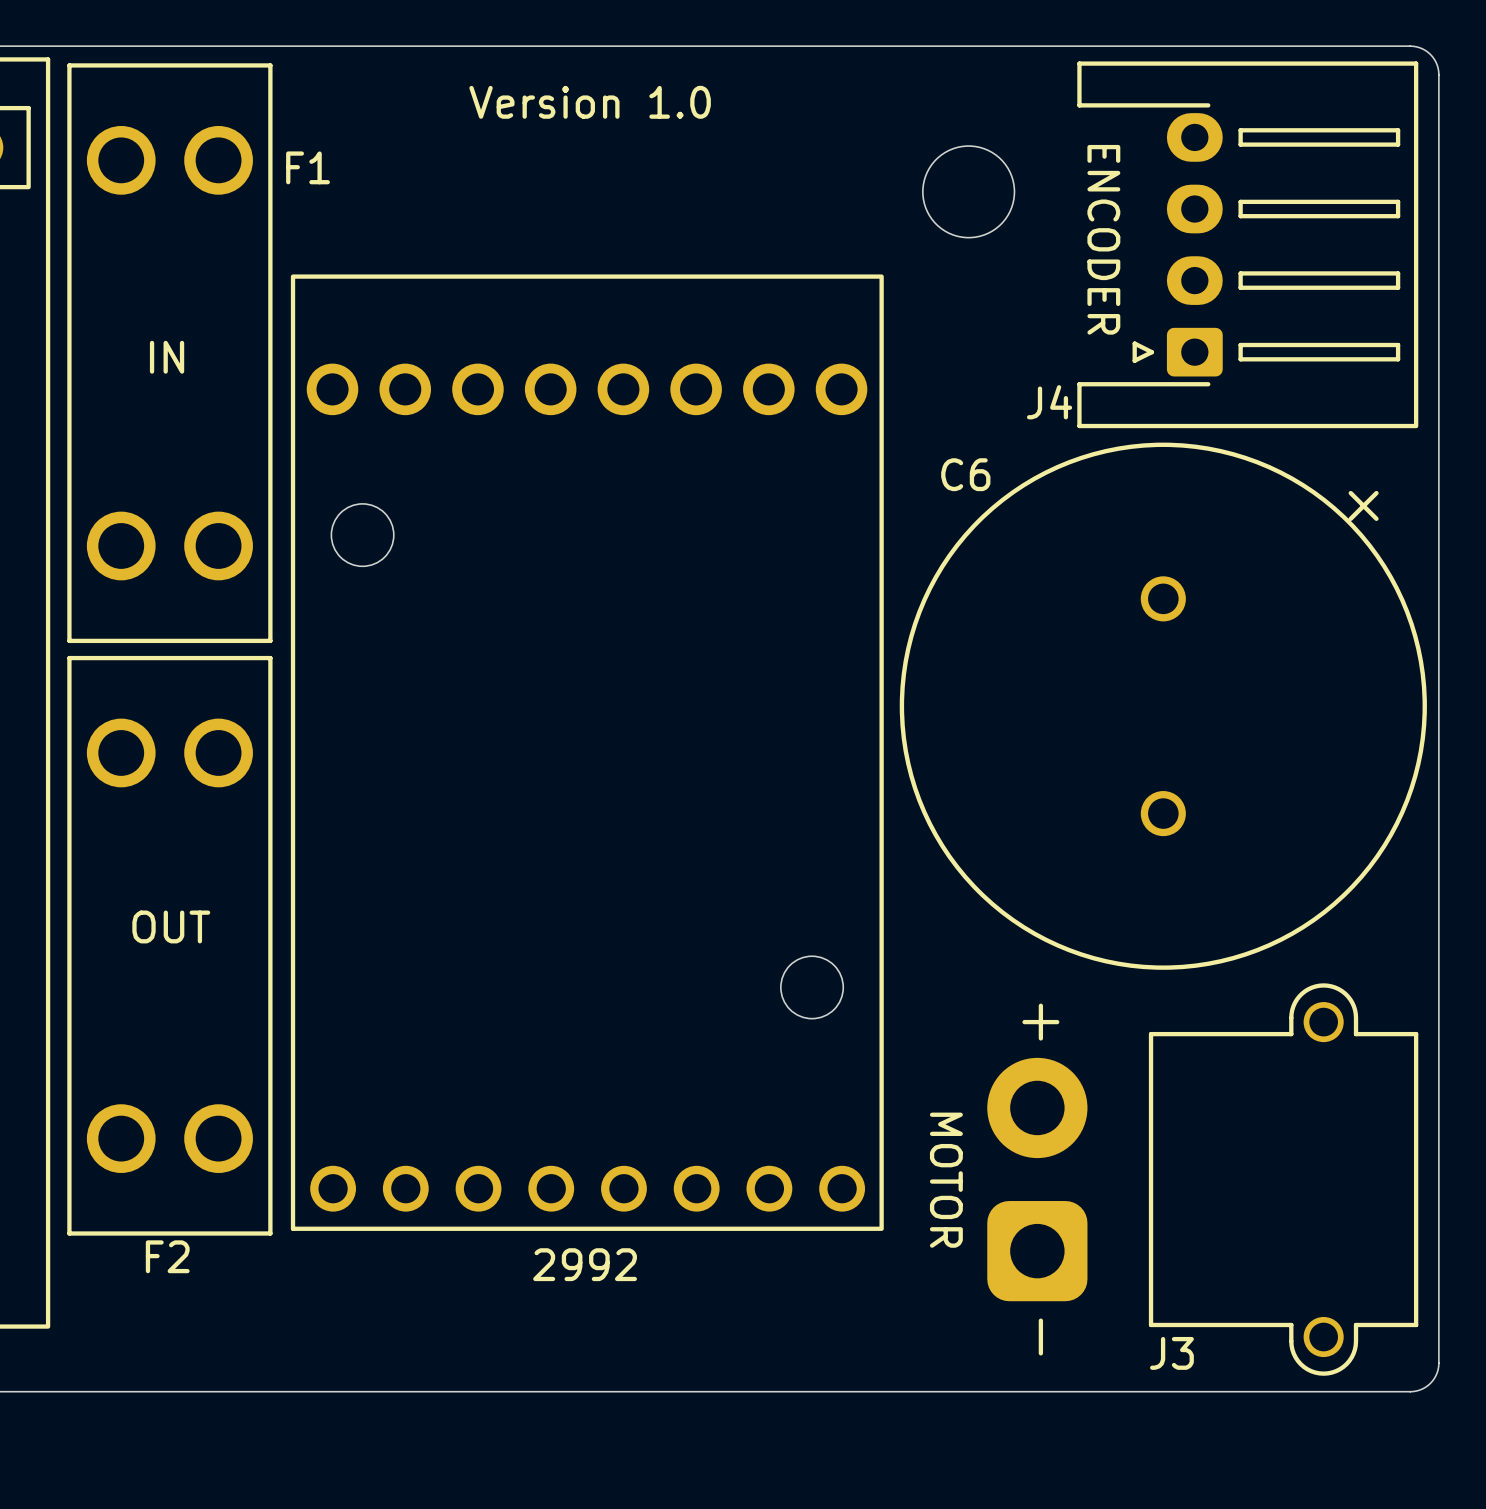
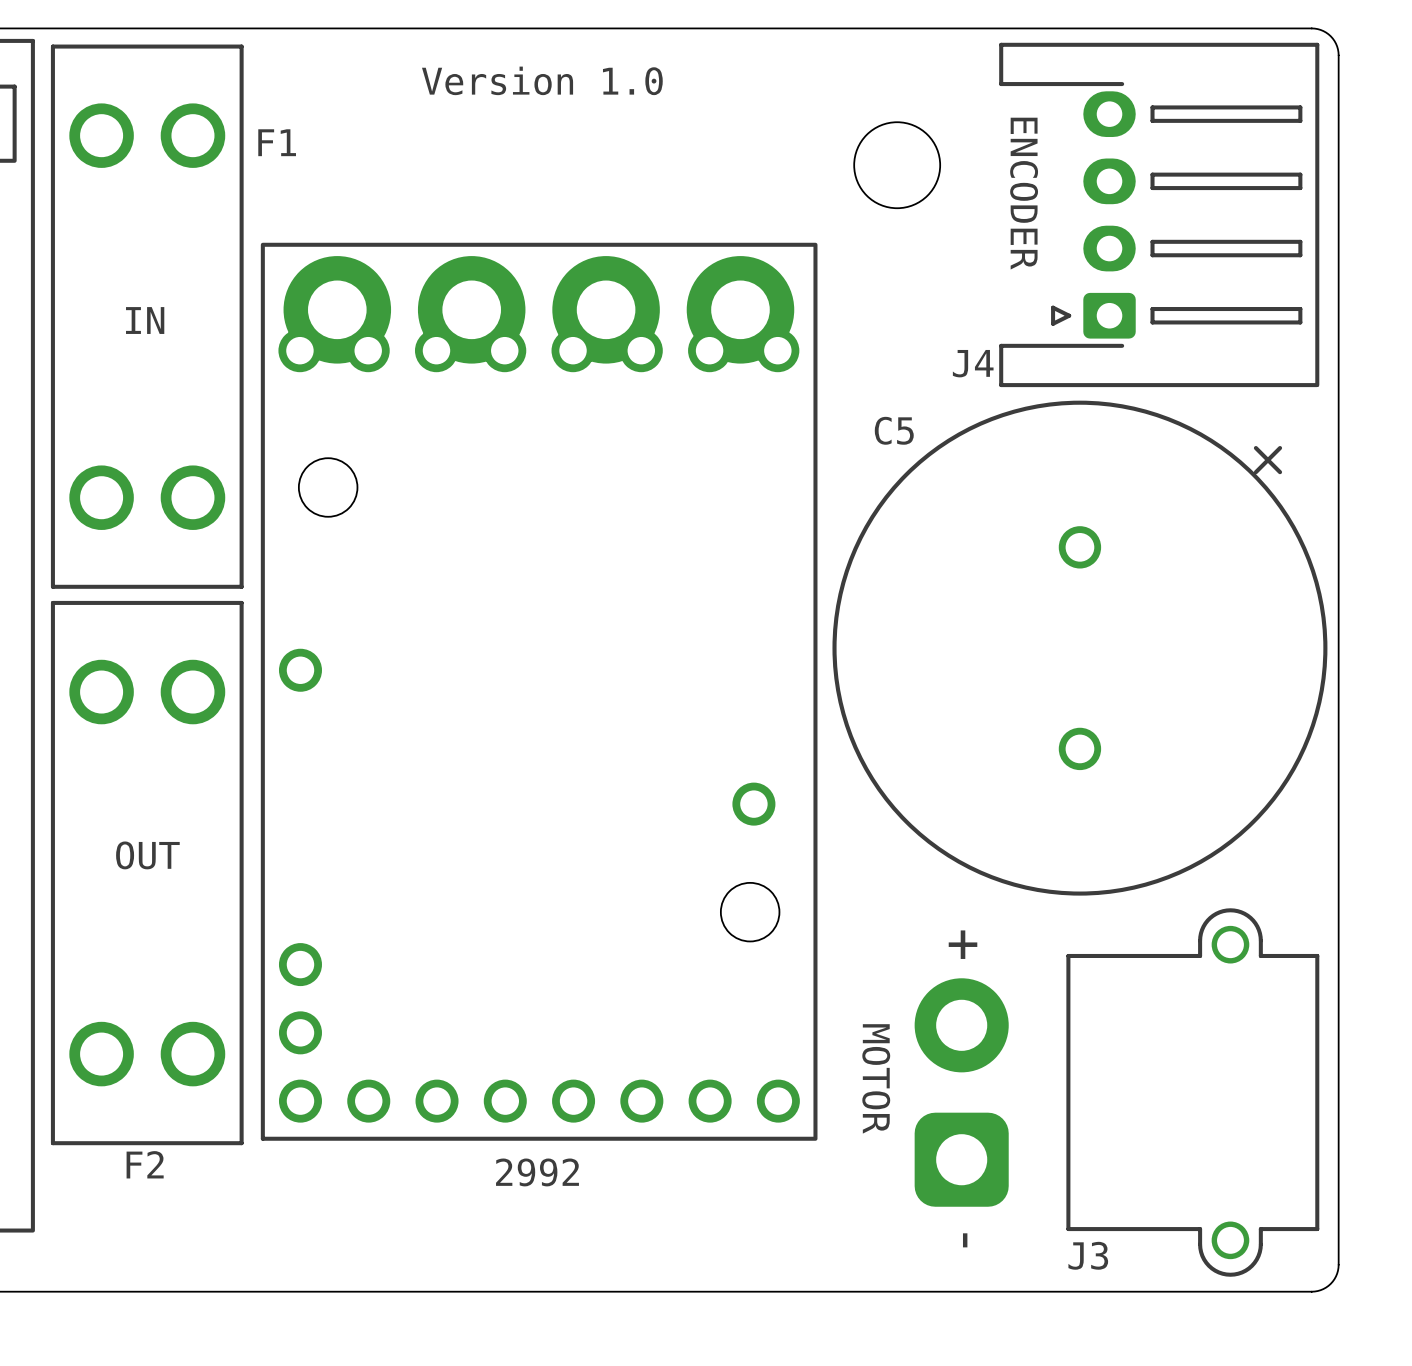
part footprint: [290, 274, 884, 1231] -> [260, 242, 818, 1141]
C6 name: C6 (965, 474) -> C5 (894, 430)

